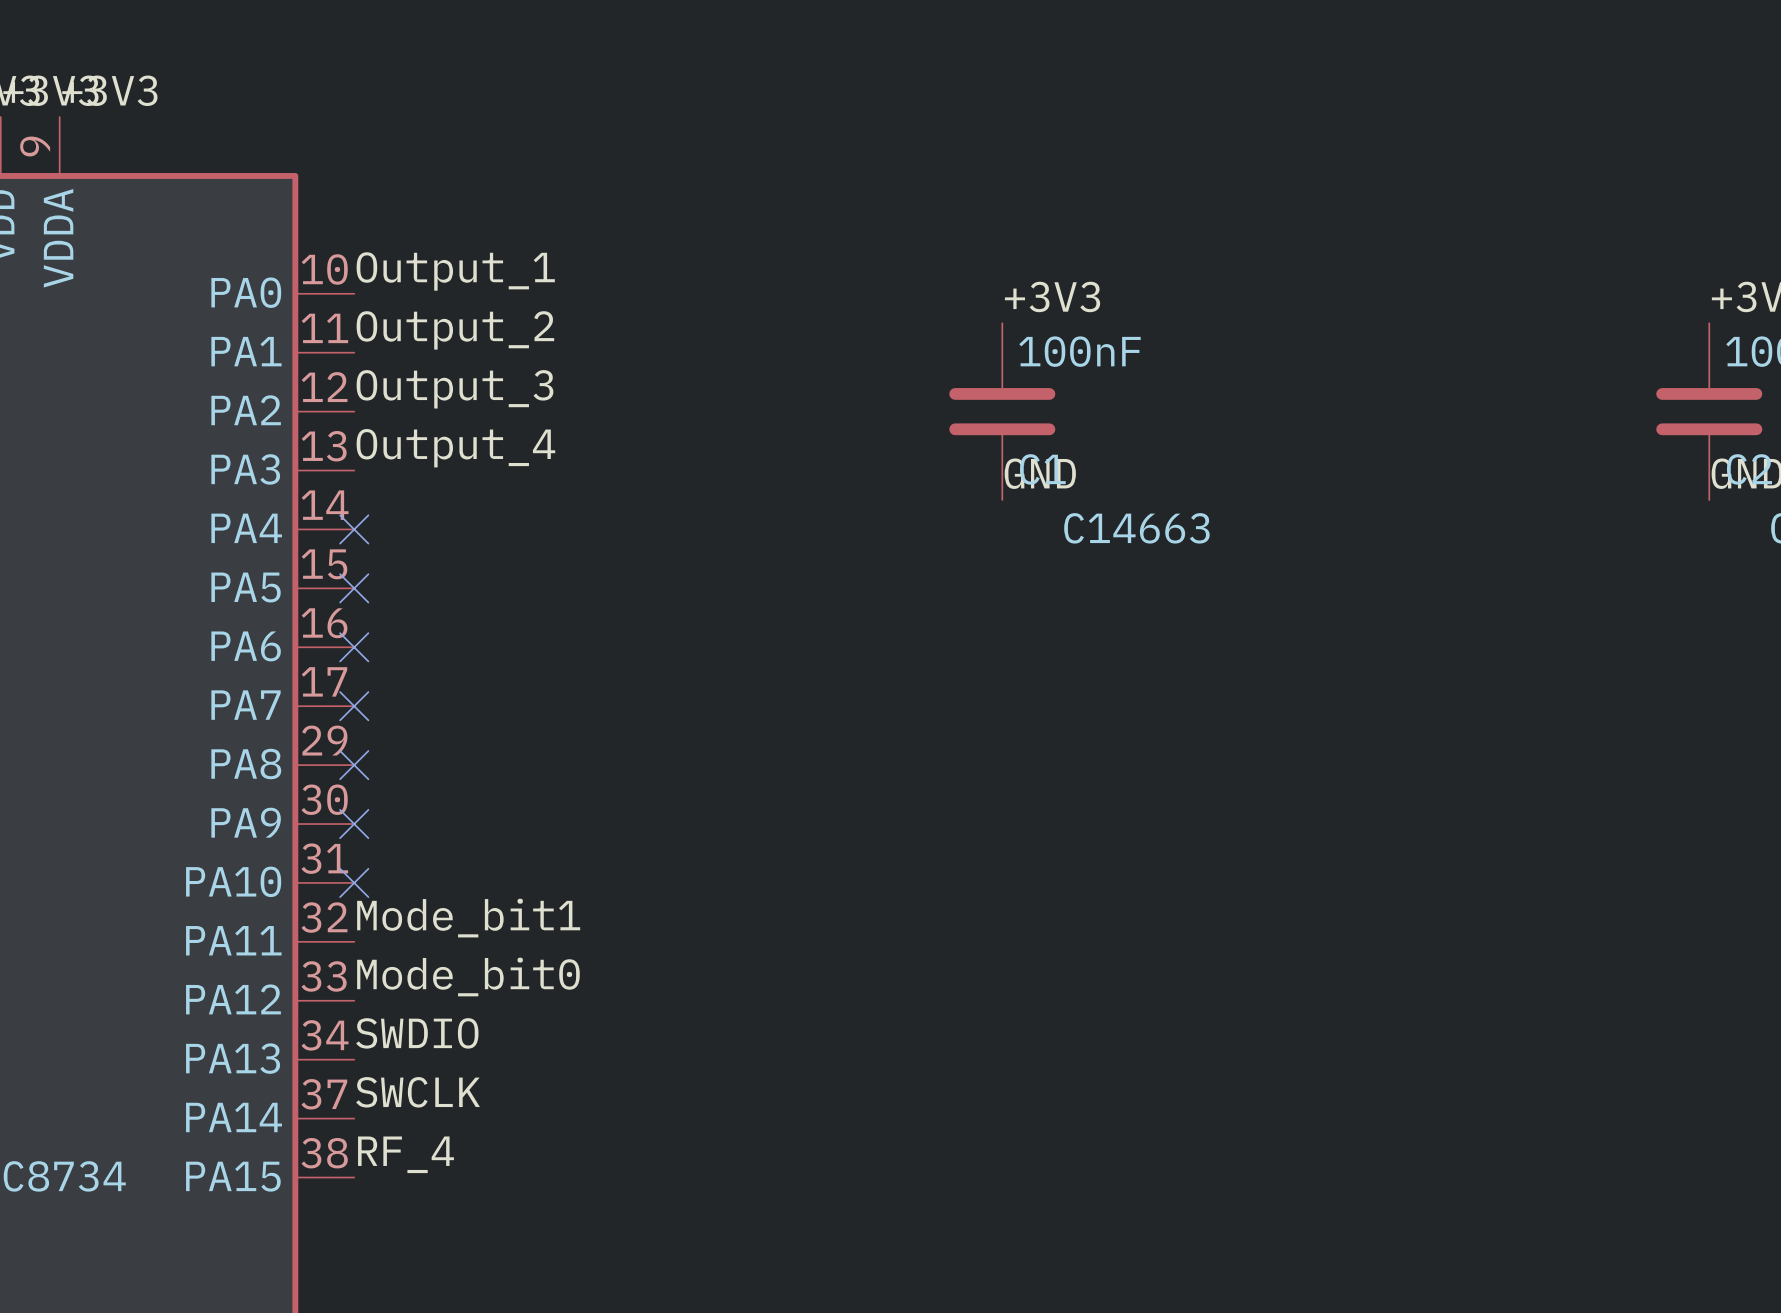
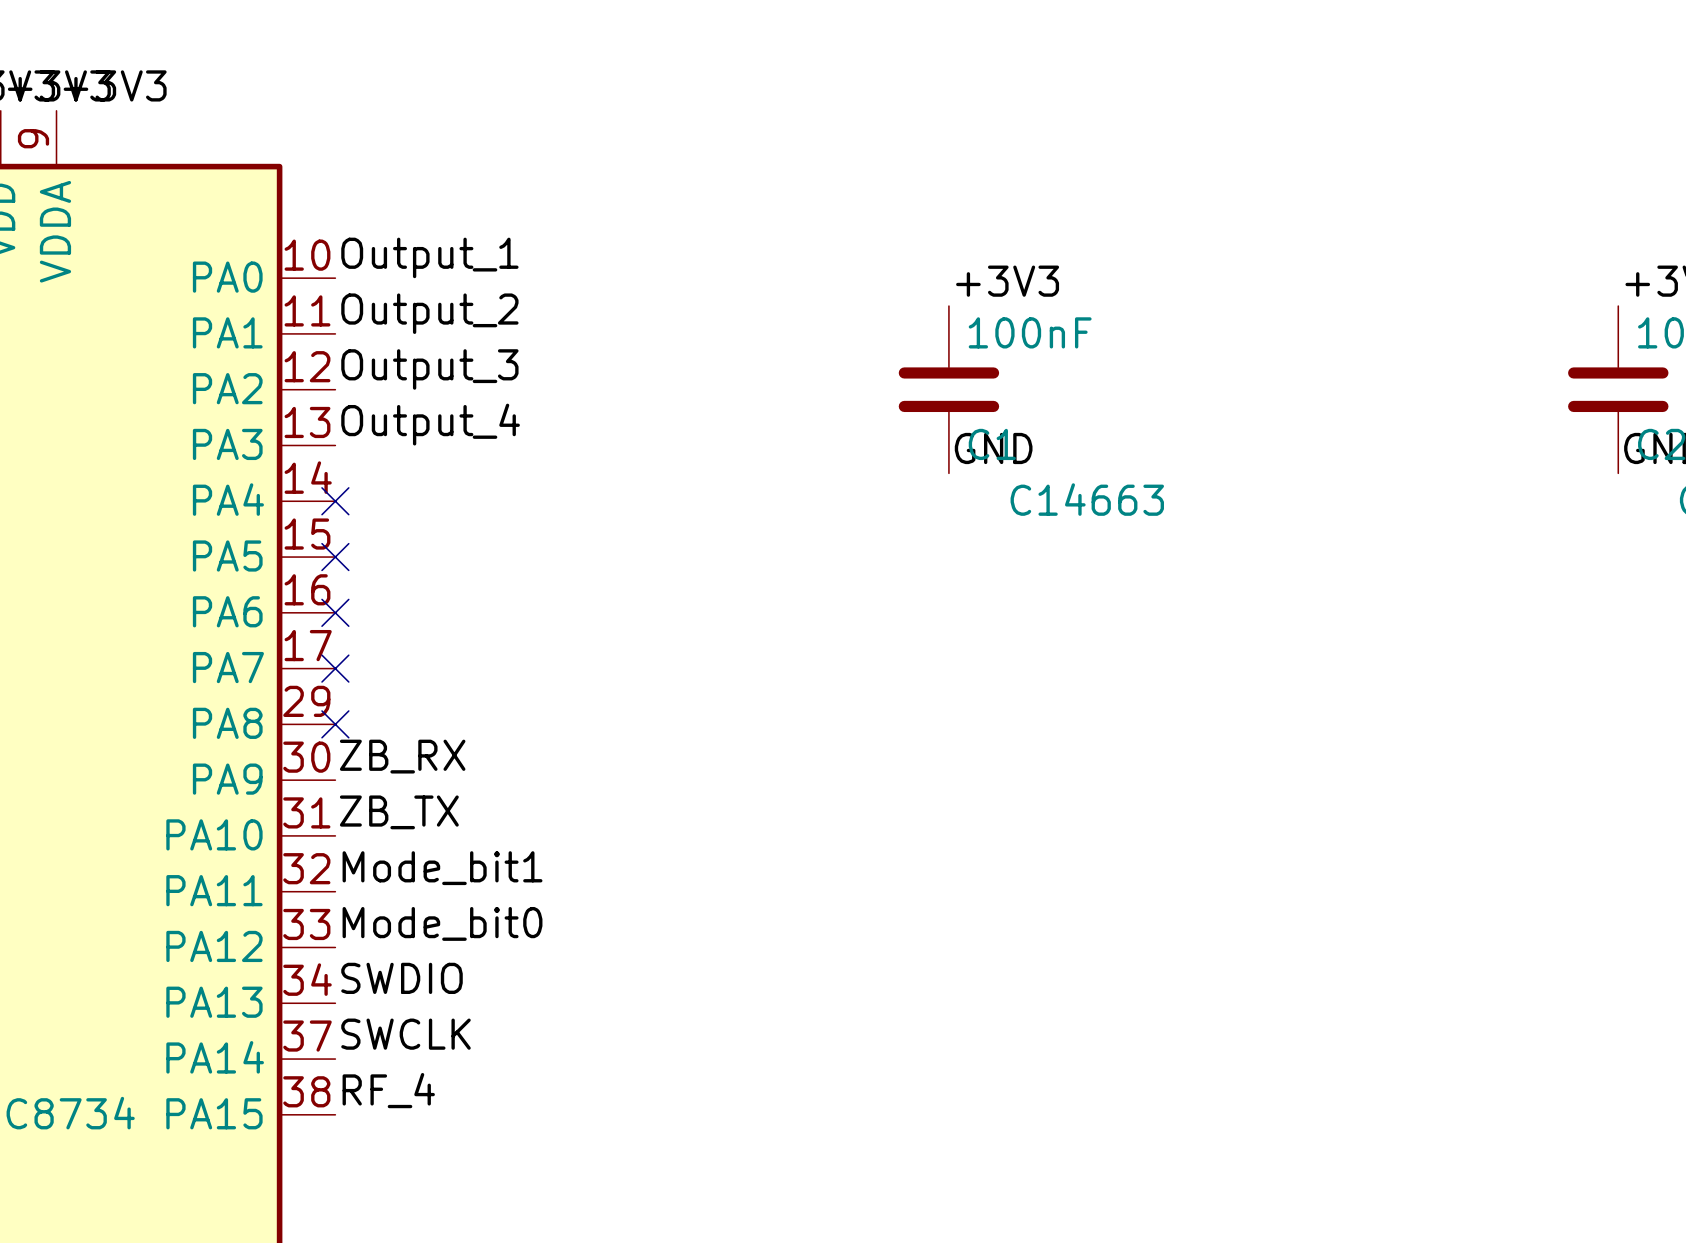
label: none -> ZB_RX (402, 756)
no-connect mark: (354, 824) -> none
label: none -> ZB_TX (399, 812)
no-connect mark: (354, 882) -> none

